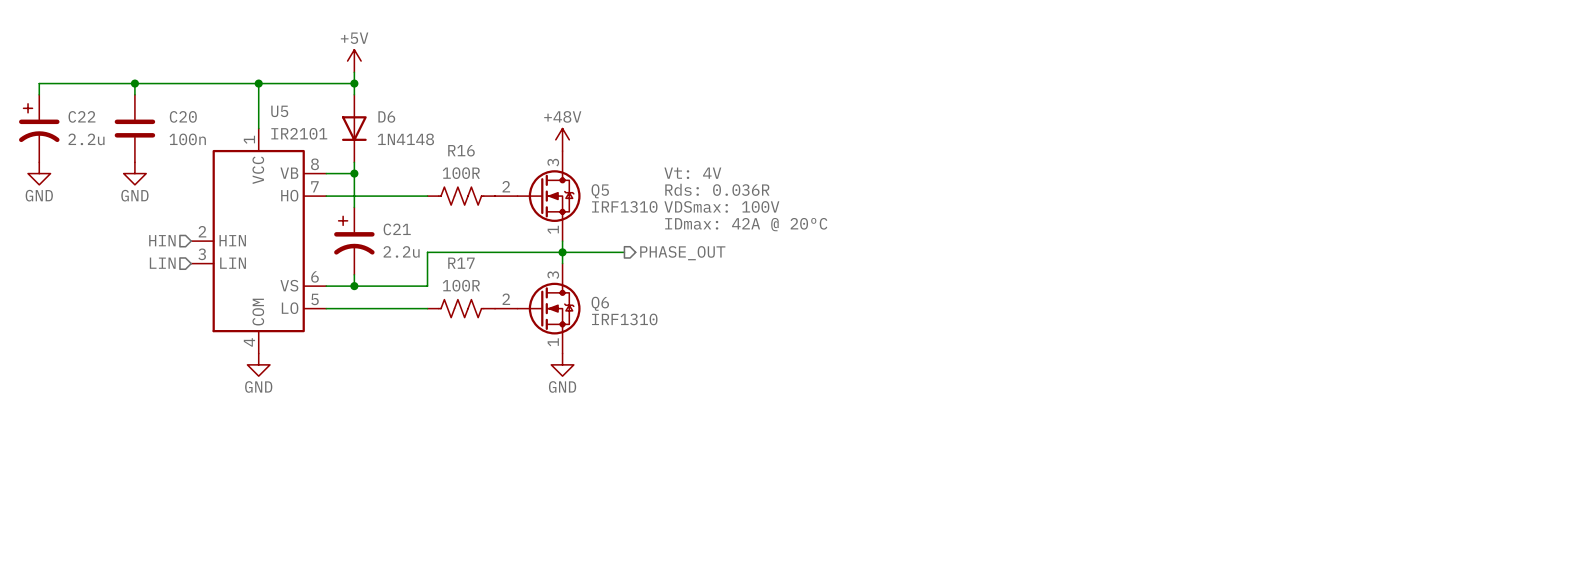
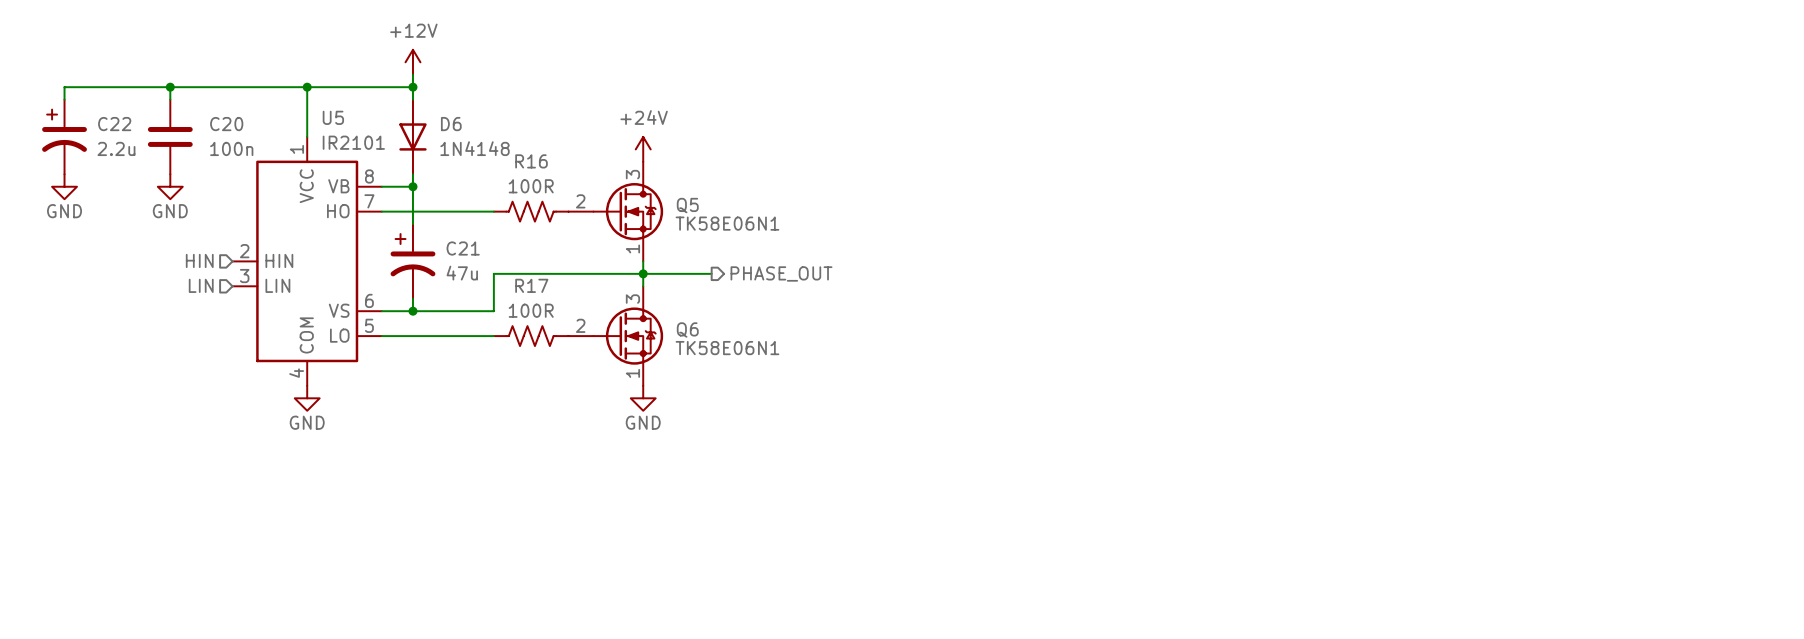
power symbol: +5V (354, 61) -> +12V (412, 62)
power symbol: +48V (562, 139) -> +24V (643, 149)
Q5 text: Vt: 4V (692, 173) -> none
Q5 text: Rds: 0.036R (717, 189) -> none
Q5 value: IRF1310 (624, 206) -> TK58E06N1 (727, 223)
Q5 text: VDSmax: 100V (721, 206) -> none
Q5 text: IDmax: 42A @ 20ºC (746, 224) -> none
C21 value: 2.2u (401, 251) -> 47u (462, 273)
Q6 value: IRF1310 (624, 319) -> TK58E06N1 (727, 348)

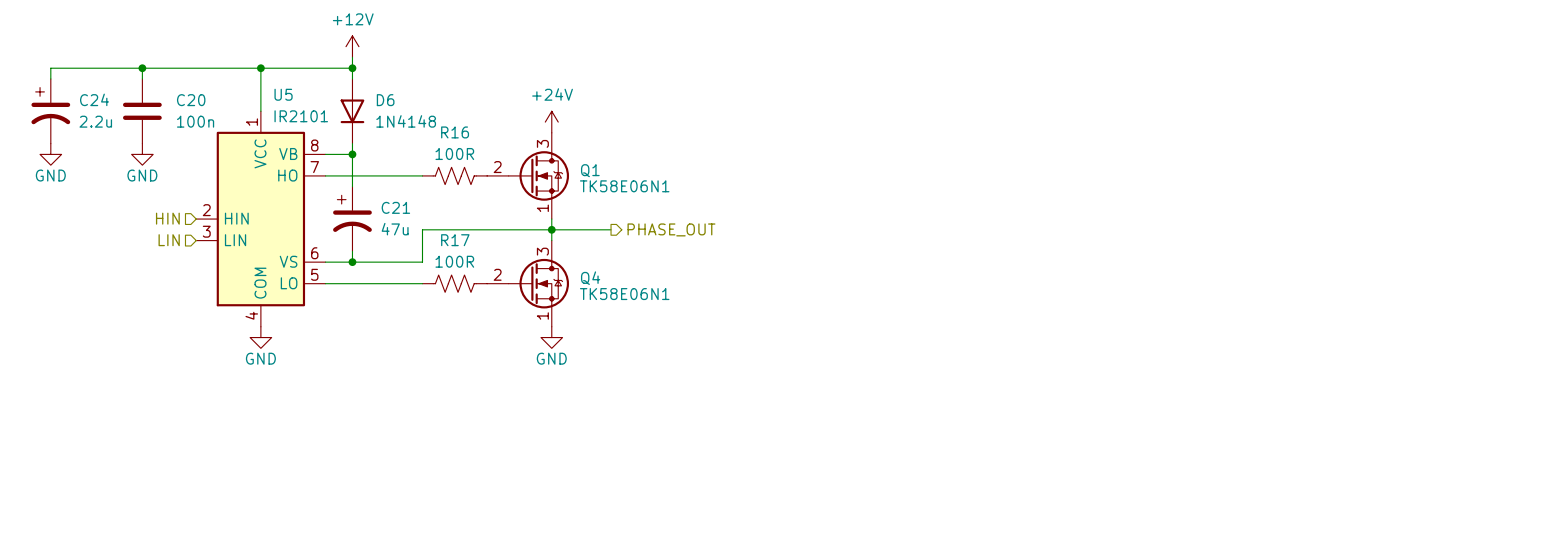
C22 name: C22 (114, 124) -> C24 (94, 99)
Q5 name: Q5 (687, 205) -> Q1 (590, 170)
Q6 name: Q6 (687, 329) -> Q4 (590, 278)

